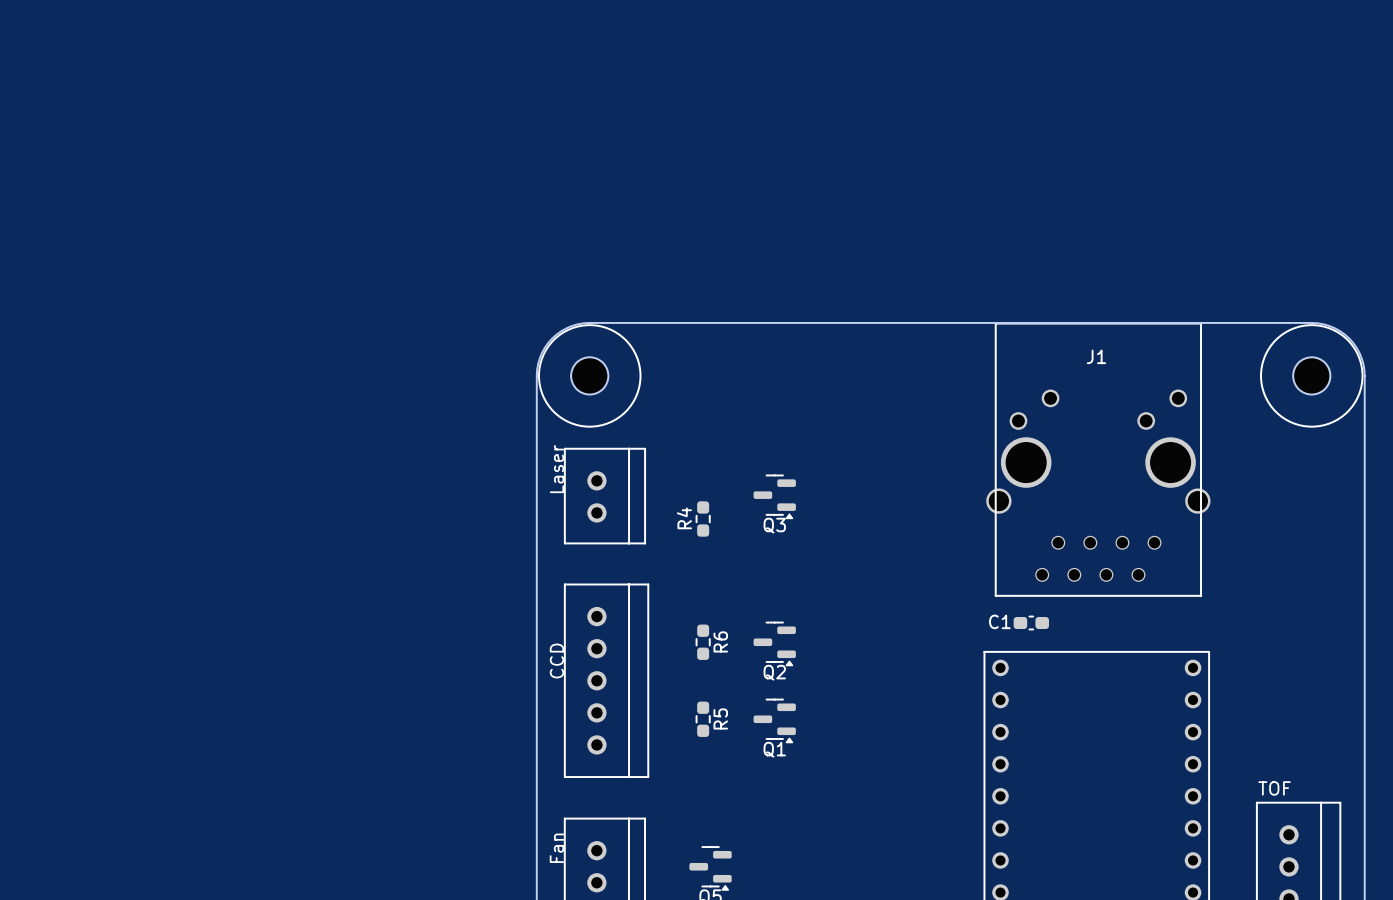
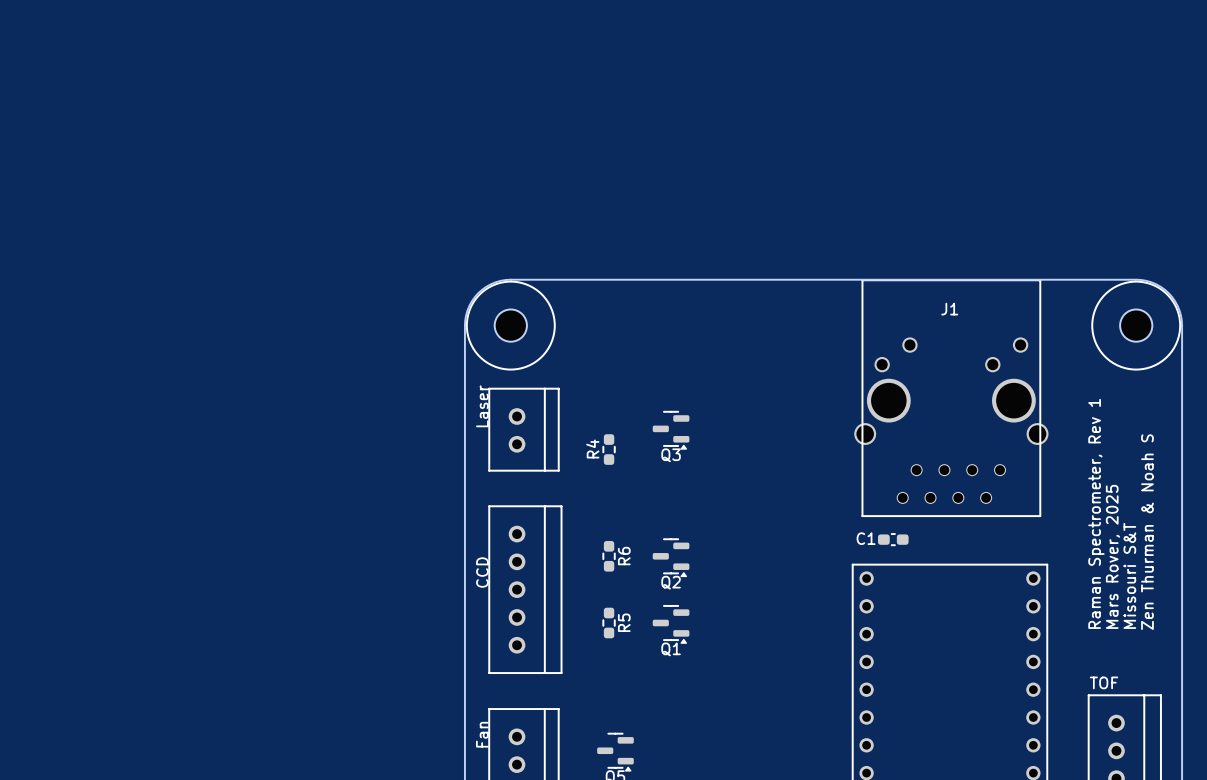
text: none -> Raman Spectrometer, Rev 1 (1096, 513)
text: none -> Zen Thurman & Noah S (1147, 532)
text: none -> Mars Rover, 2025 (1113, 556)
text: none -> Missouri S&T (1129, 575)

